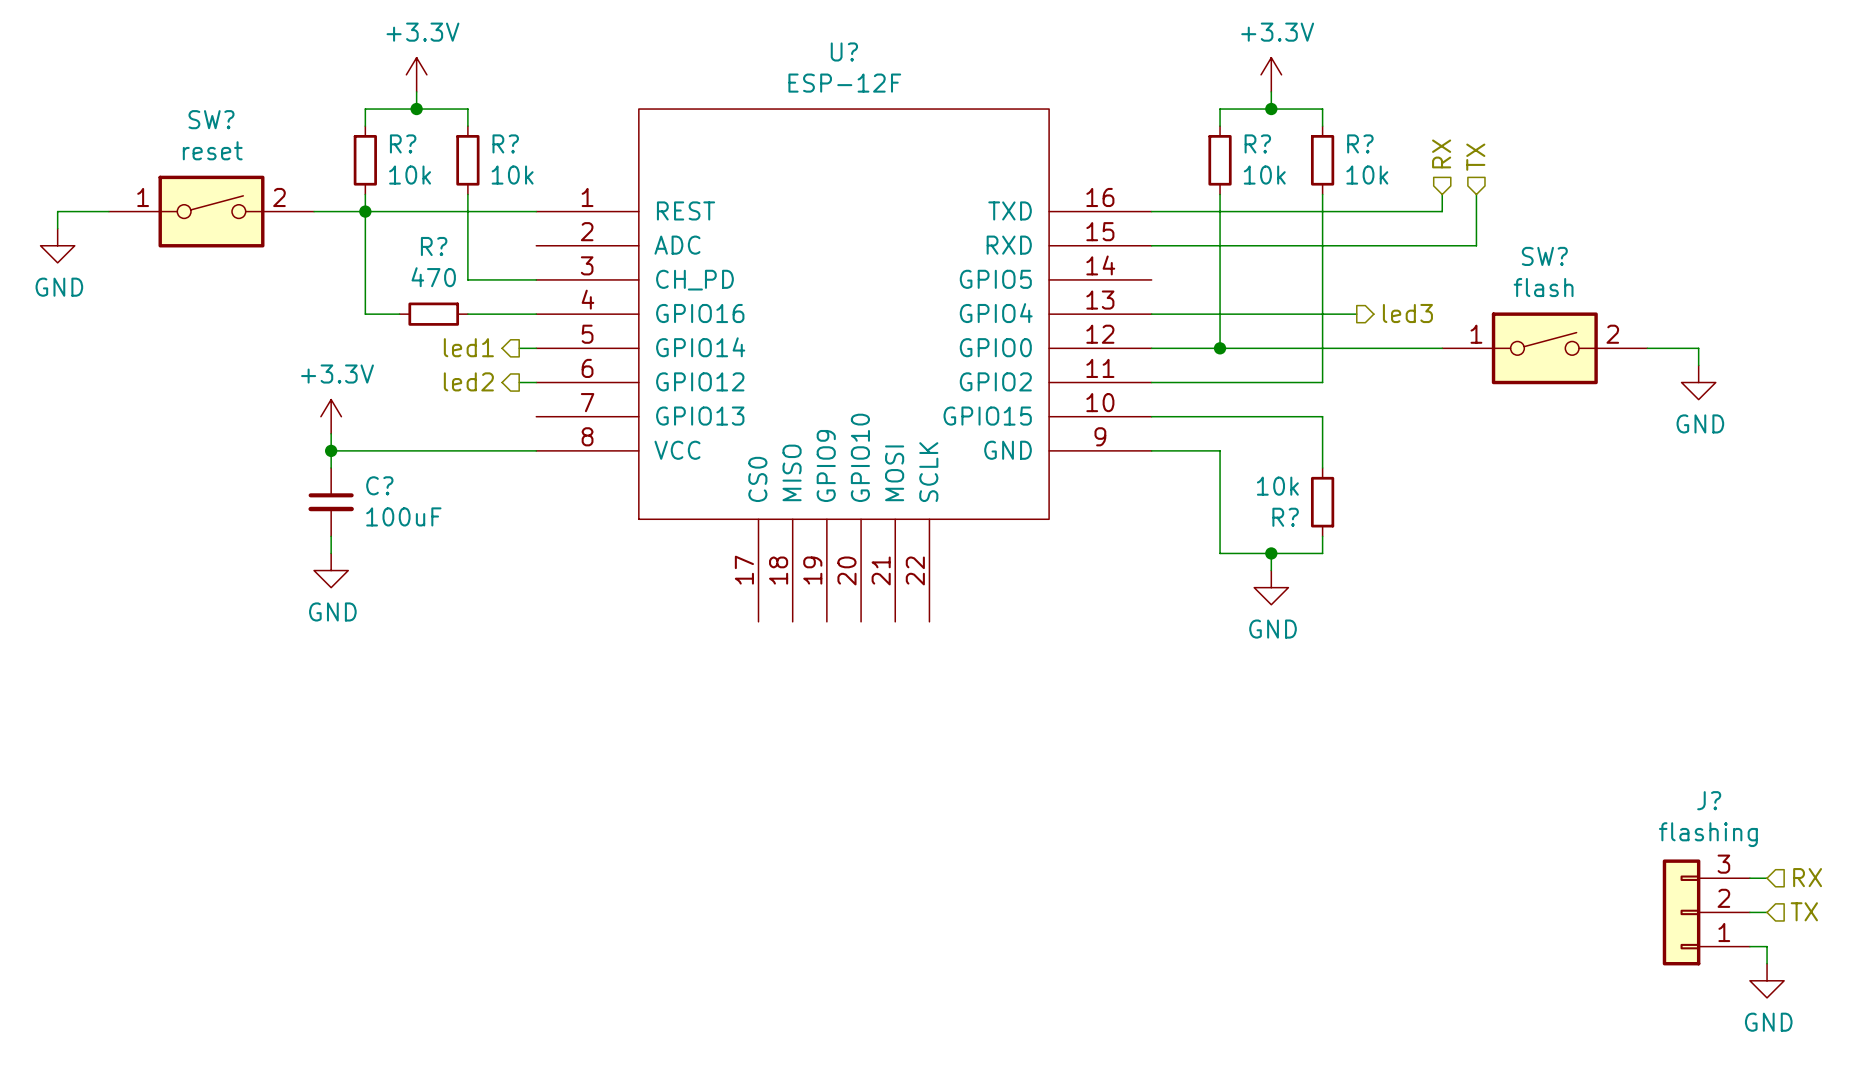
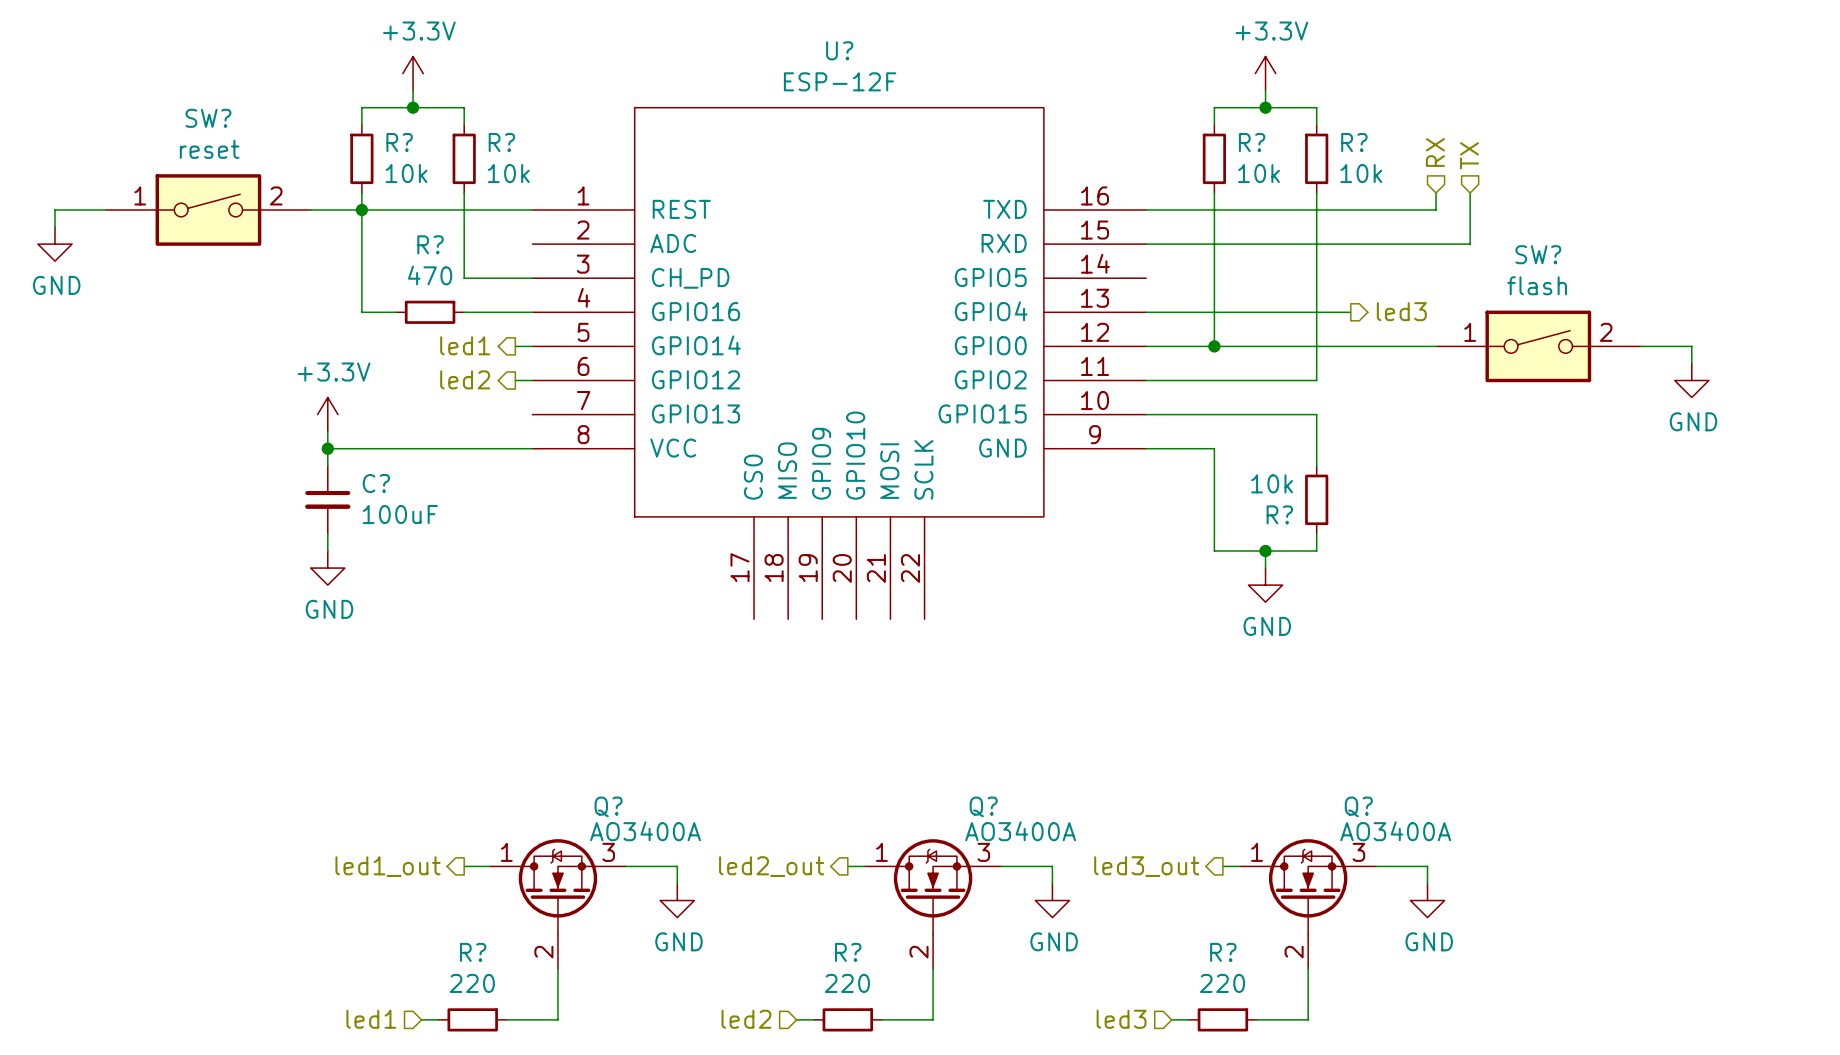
hierarchical label: none -> led1_out (388, 866)
wire: none -> (464, 866) (489, 866)
wire: none -> (626, 866) (677, 866) (677, 883)
hierarchical label: none -> led2_out (771, 866)
wire: none -> (847, 866) (864, 866)
wire: none -> (1001, 866) (1052, 866) (1052, 883)
hierarchical label: none -> led3_out (1146, 866)
wire: none -> (1222, 866) (1239, 866)
wire: none -> (1376, 866) (1427, 866) (1427, 883)
hierarchical label: RX (1807, 877) -> none
wire: (1749, 878) (1767, 878) -> none
power symbol: none -> GND (677, 900)
power symbol: none -> GND (1052, 900)
power symbol: none -> GND (1427, 900)
Q?: none -> AO3400A (557, 903)
Q?: none -> AO3400A (933, 903)
Q?: none -> AO3400A (1308, 903)
hierarchical label: TX (1804, 911) -> none
J?: flashing (1706, 912) -> none
wire: (1749, 912) (1767, 912) -> none
wire: (1749, 946) (1767, 946) (1767, 963) -> none
wire: none -> (557, 968) (557, 1019) (506, 1019)
wire: none -> (933, 968) (933, 1019) (881, 1019)
wire: none -> (1308, 968) (1308, 1019) (1257, 1019)
power symbol: GND (1767, 980) -> none
hierarchical label: none -> led1 (371, 1019)
hierarchical label: none -> led2 (746, 1019)
hierarchical label: none -> led3 (1121, 1019)
wire: none -> (421, 1019) (438, 1019)
R?: none -> 220 (472, 1019)
wire: none -> (796, 1019) (813, 1019)
R?: none -> 220 (847, 1019)
wire: none -> (1171, 1019) (1188, 1019)
R?: none -> 220 (1222, 1019)

